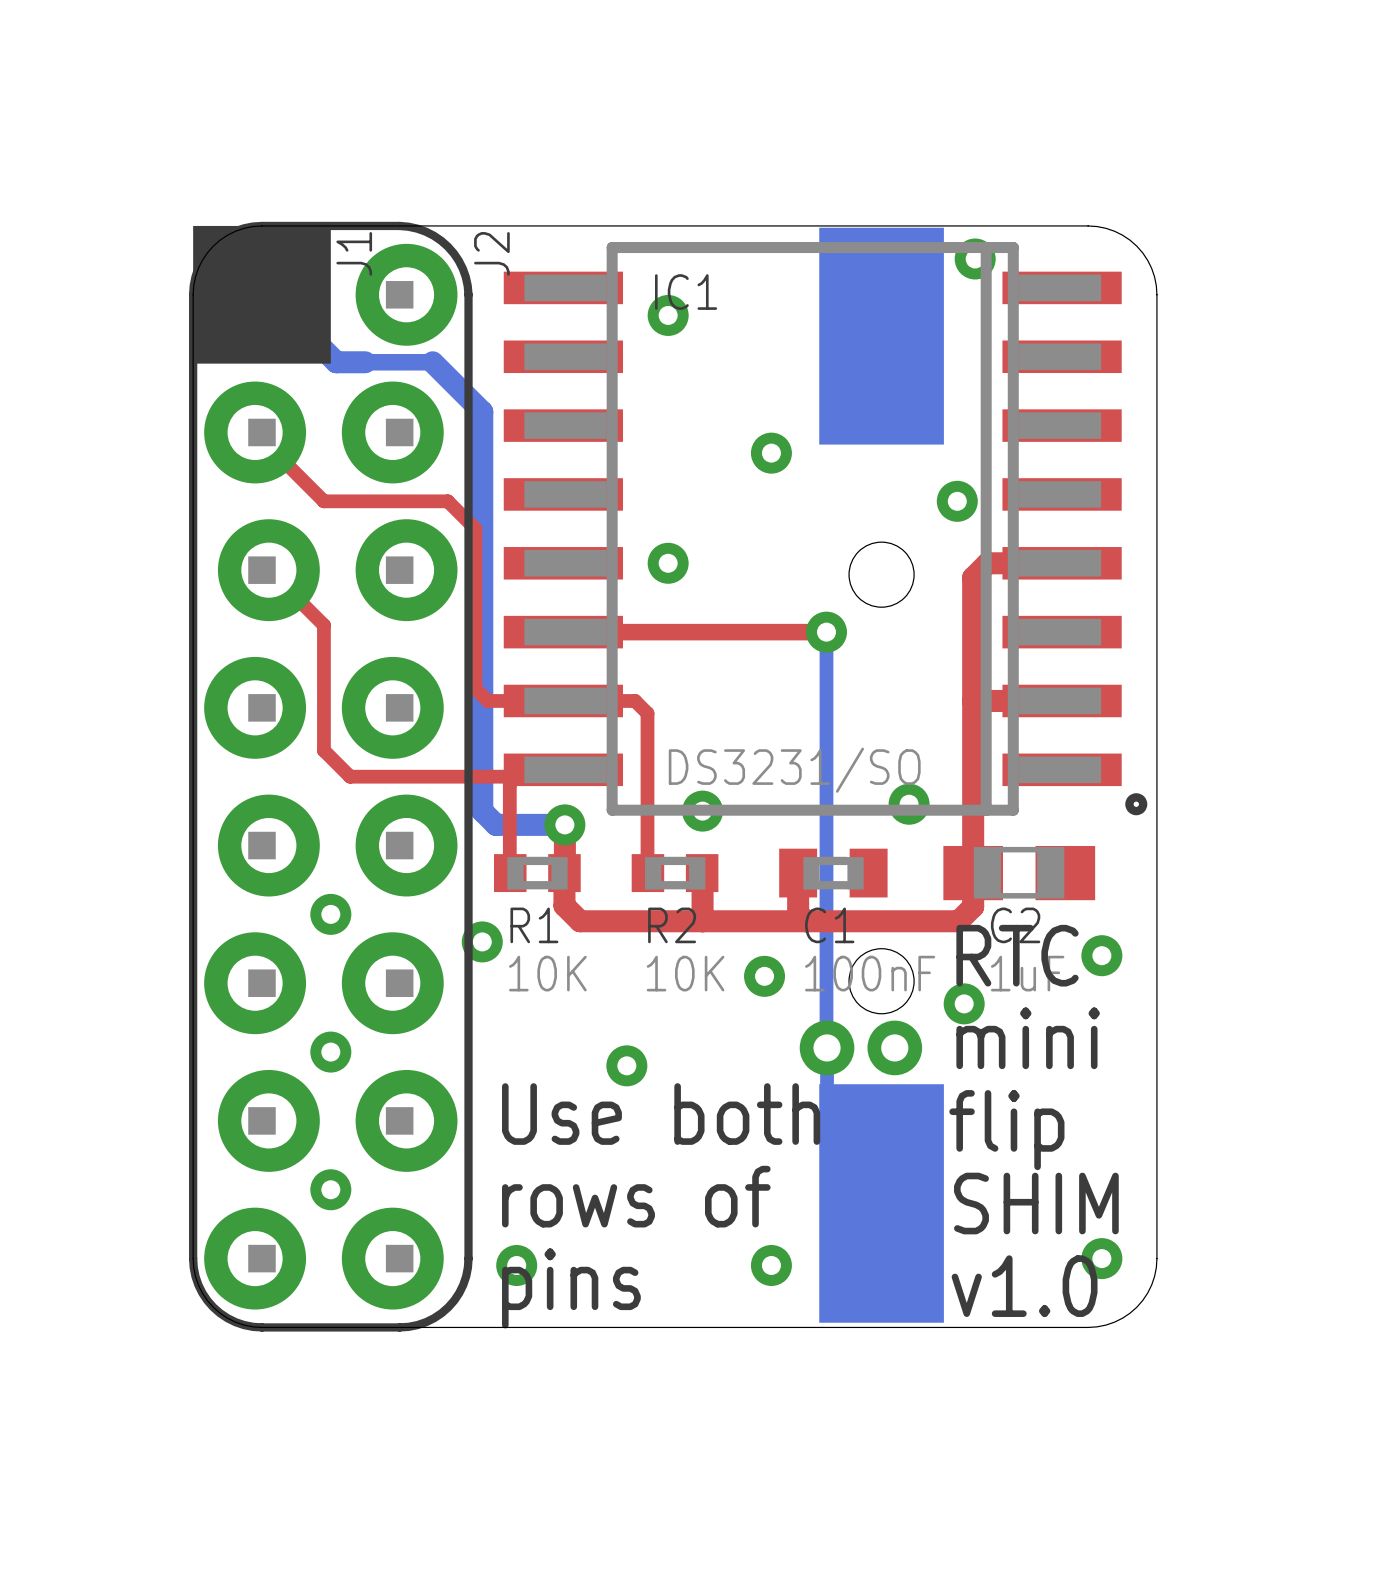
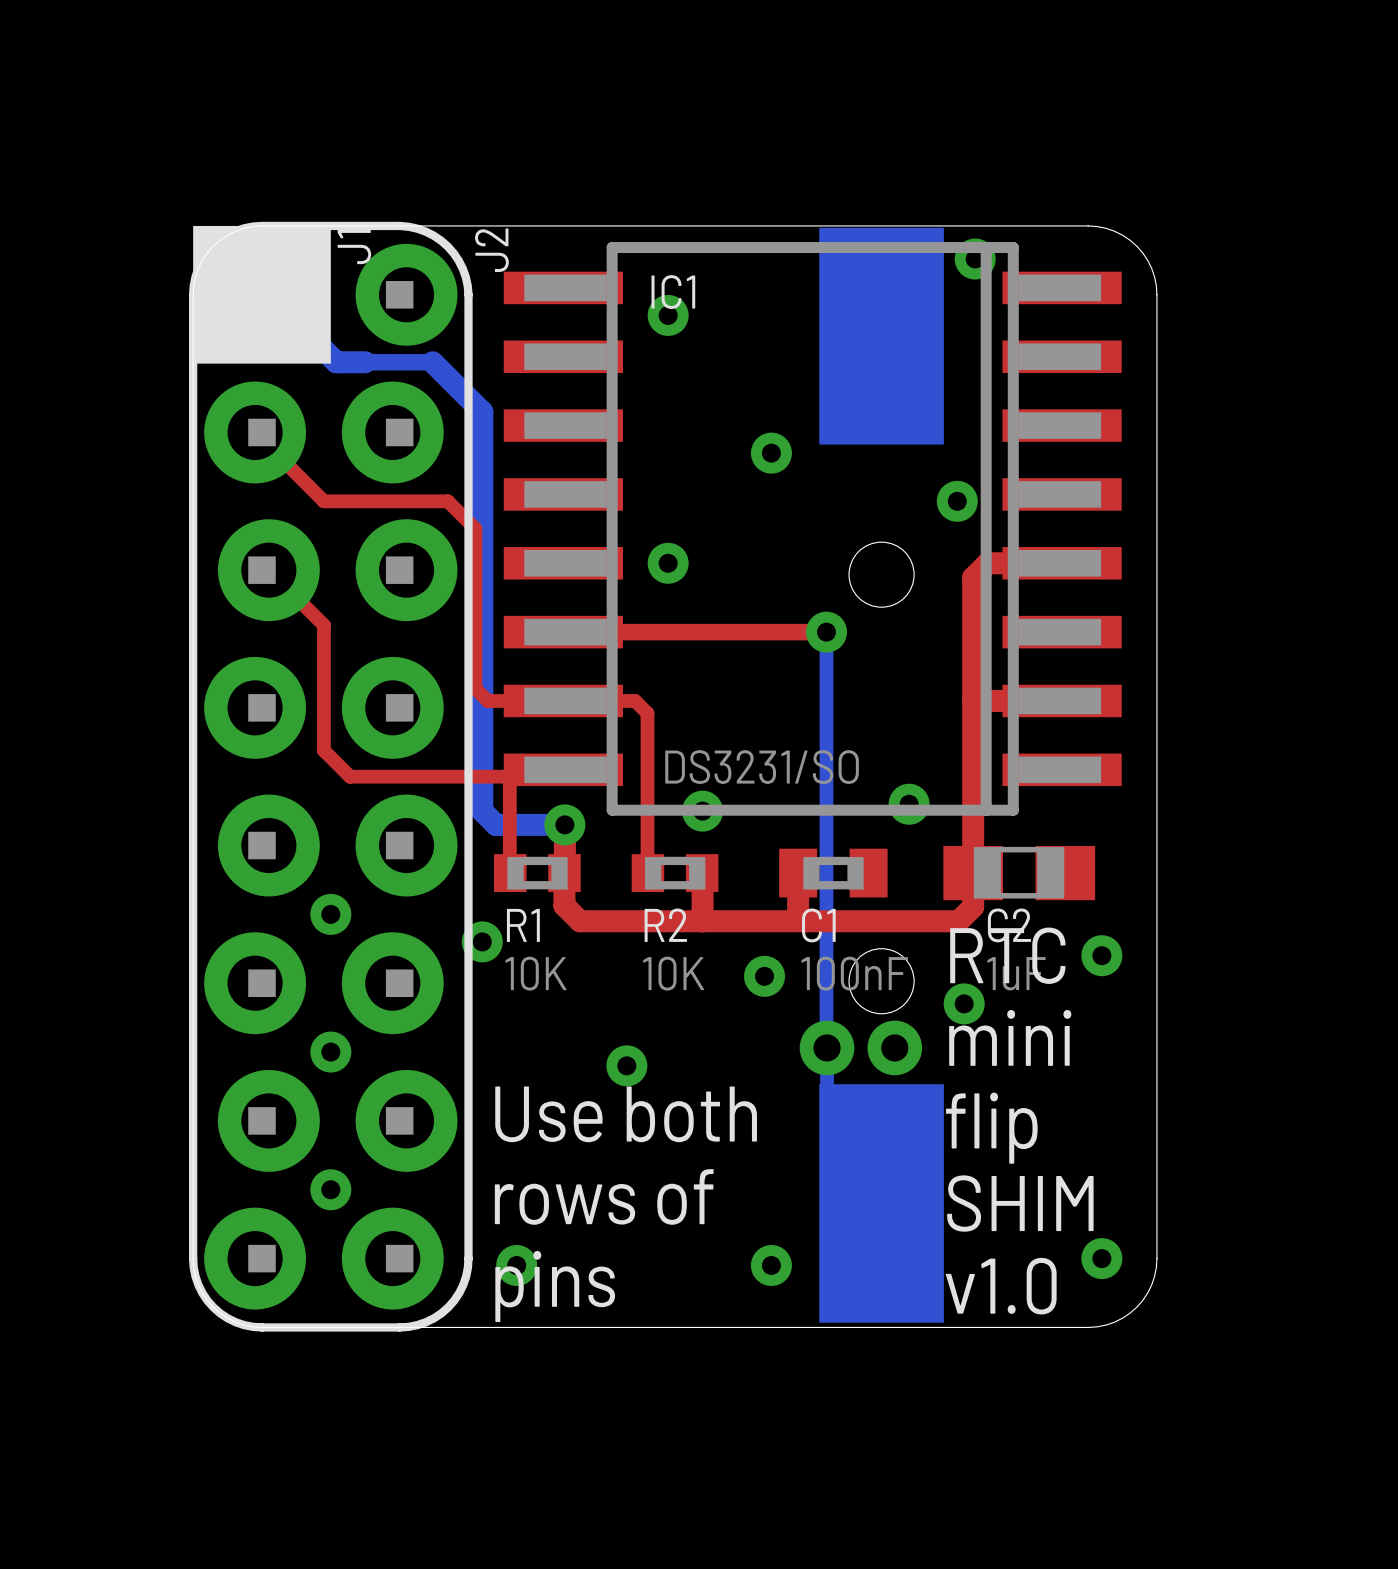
drawing: [1125, 793, 1148, 816] -> none

